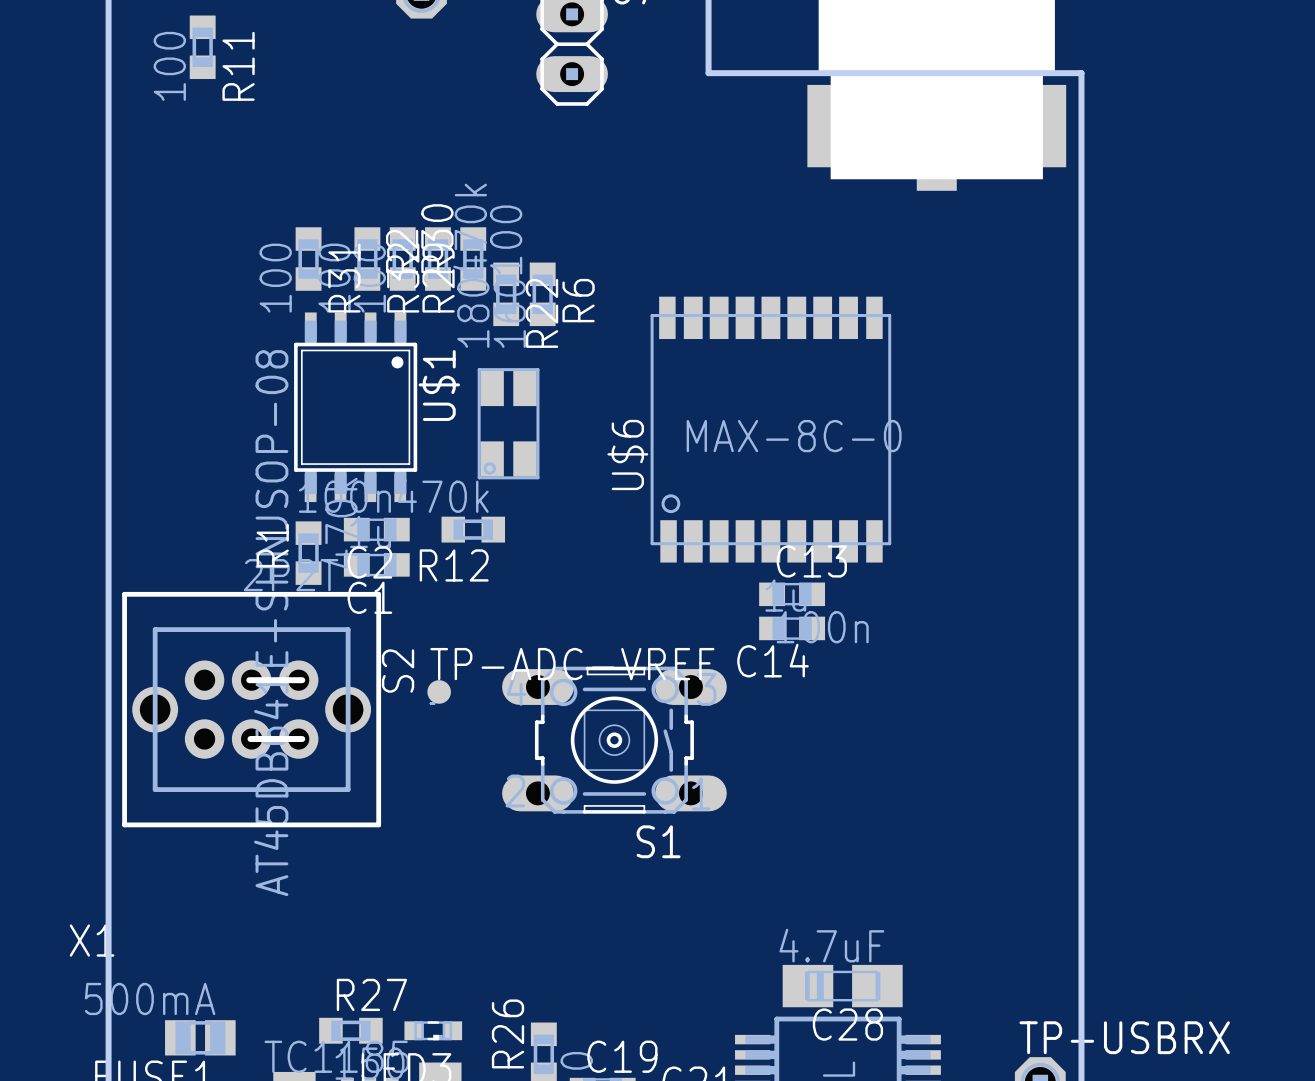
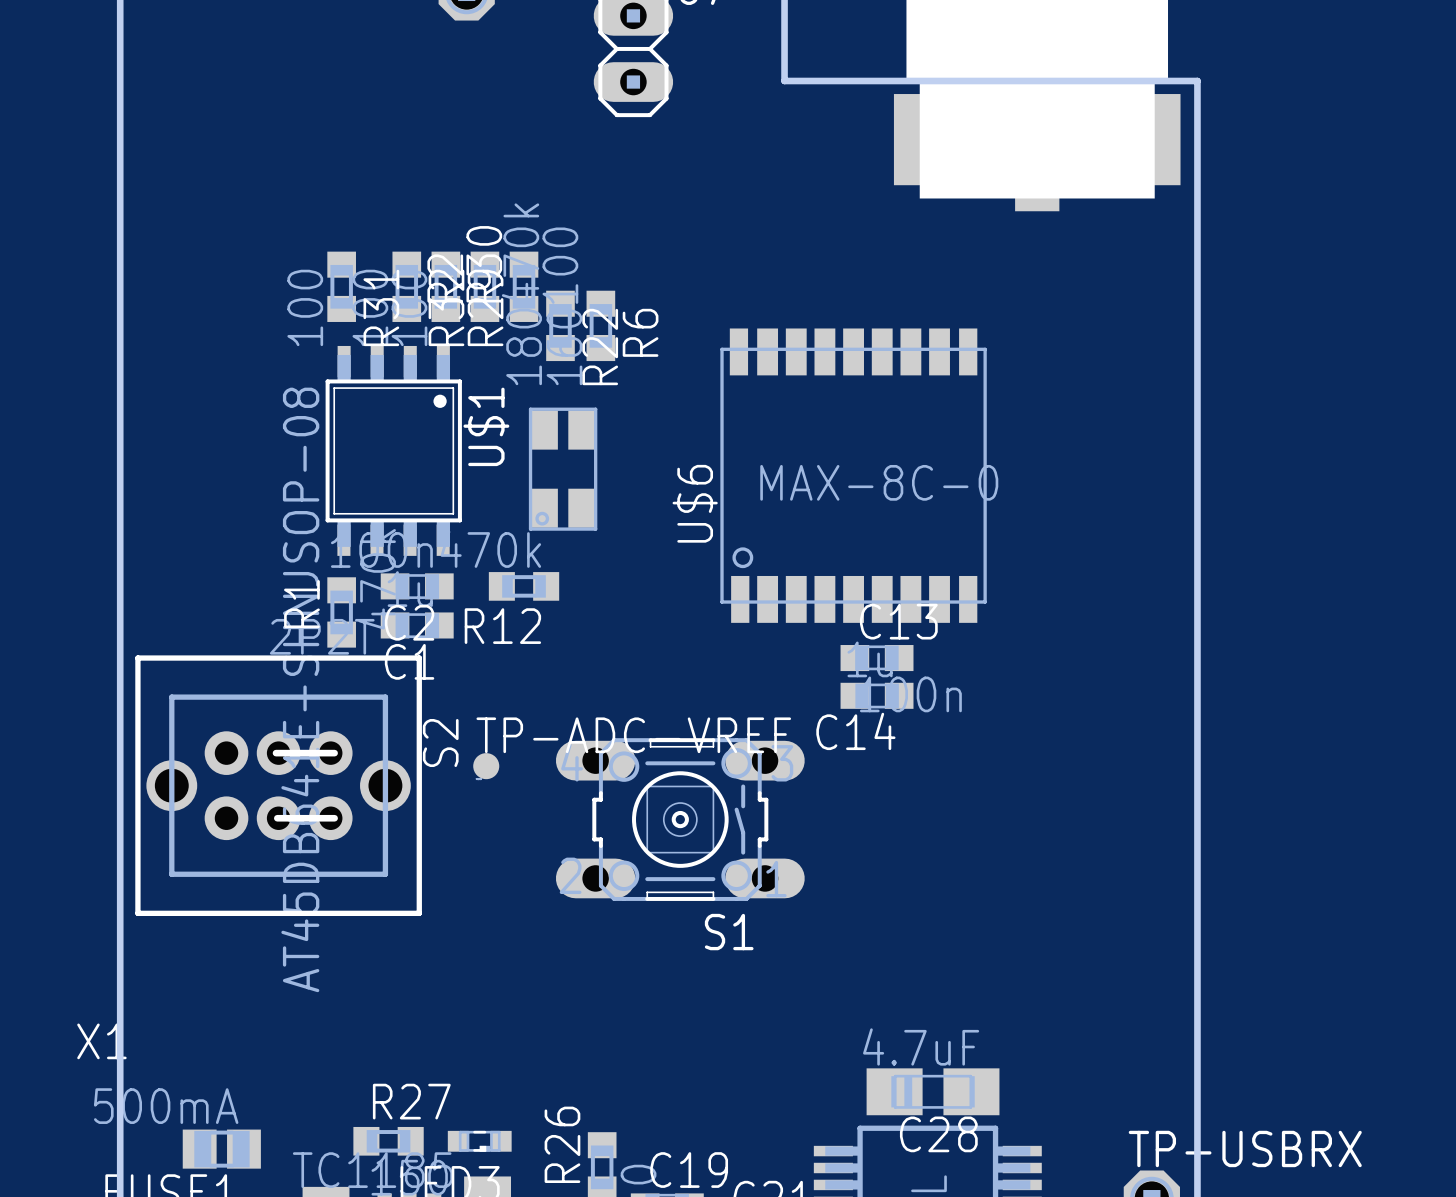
R11: 100 (202, 47) -> none

